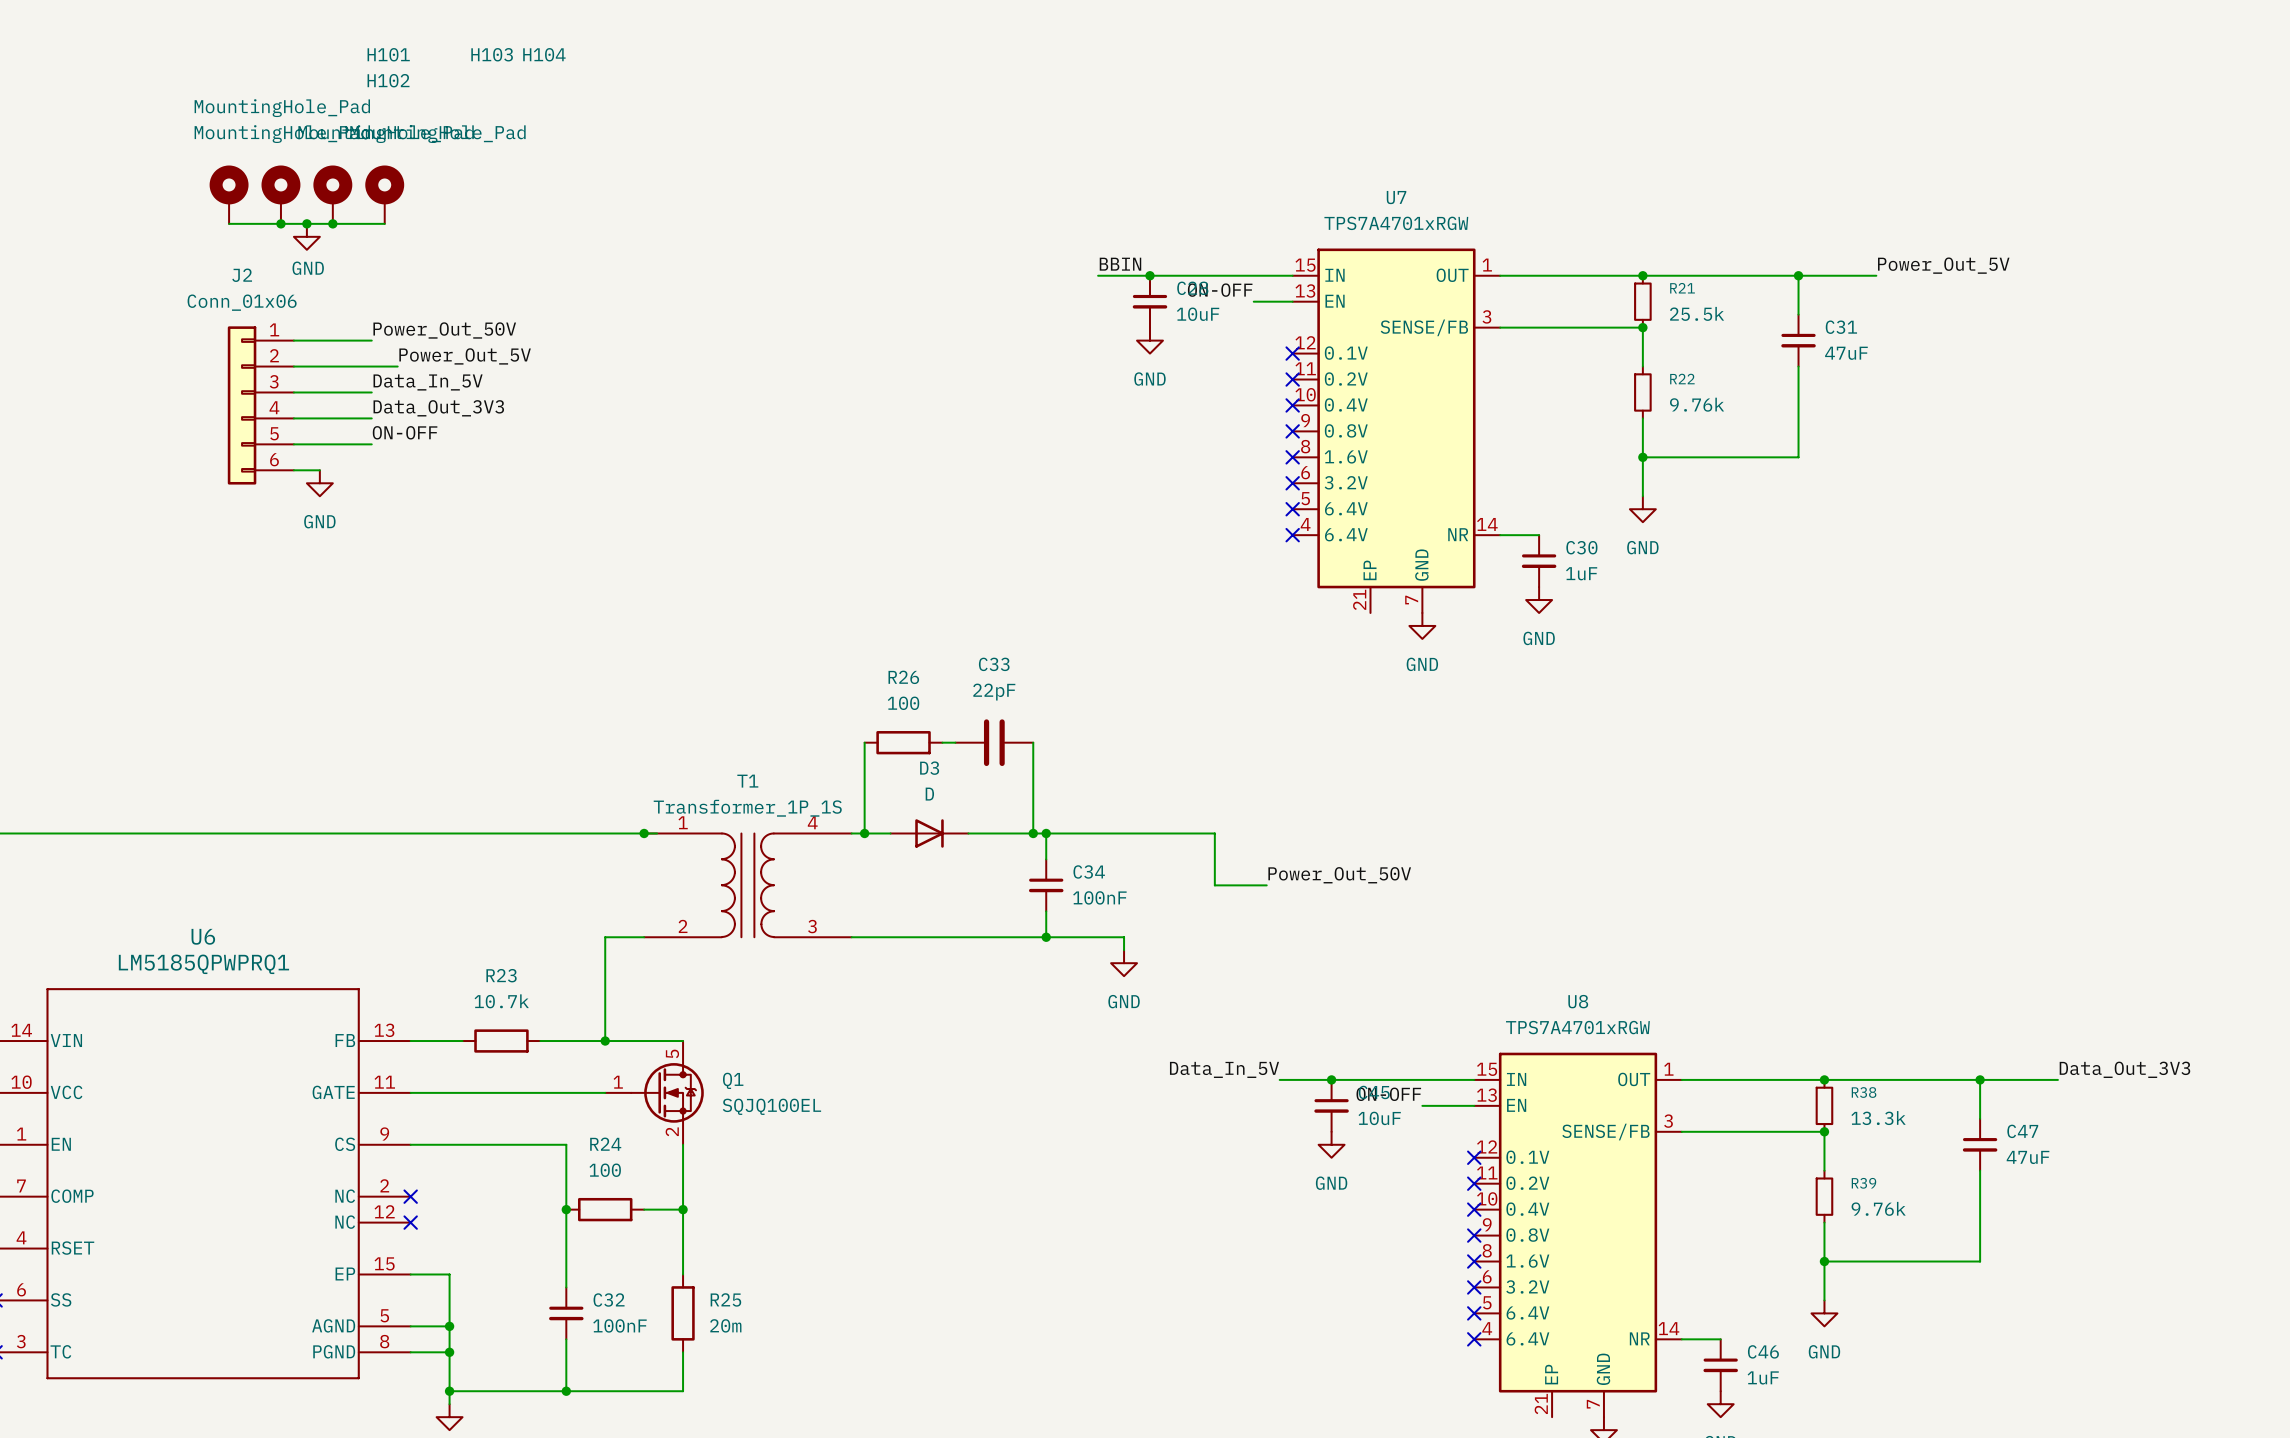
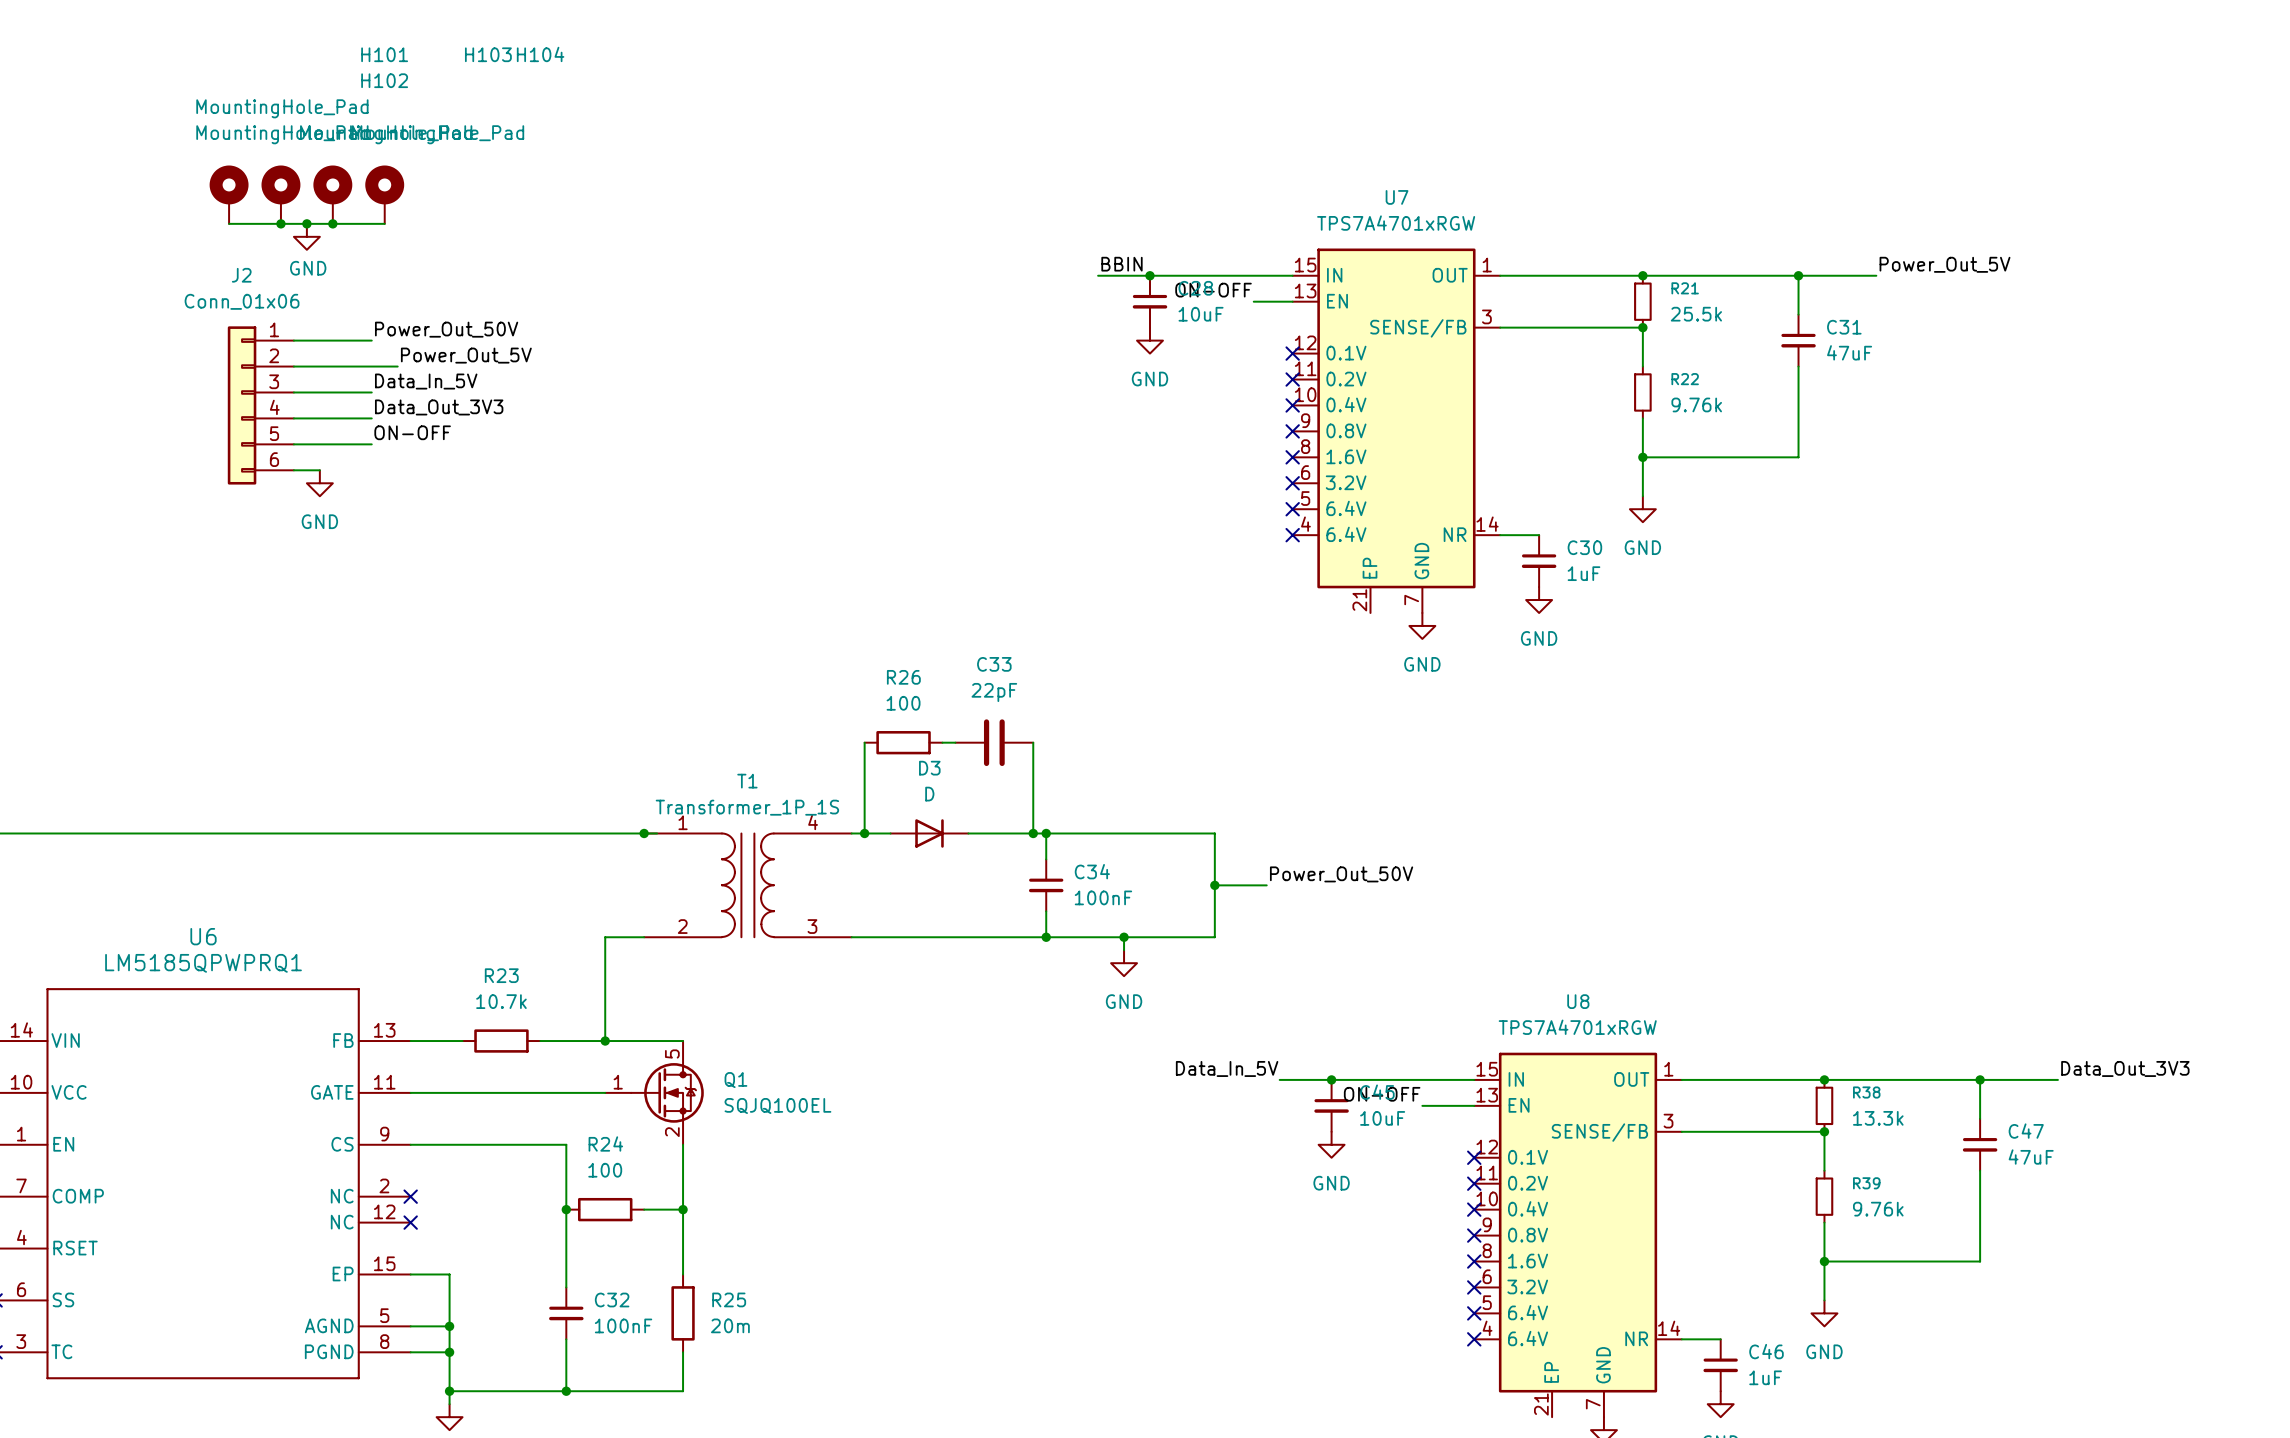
wire: none -> (1214, 885) (1214, 937) (1124, 937)
junction: none -> (1214, 885)
junction: none -> (1124, 937)

